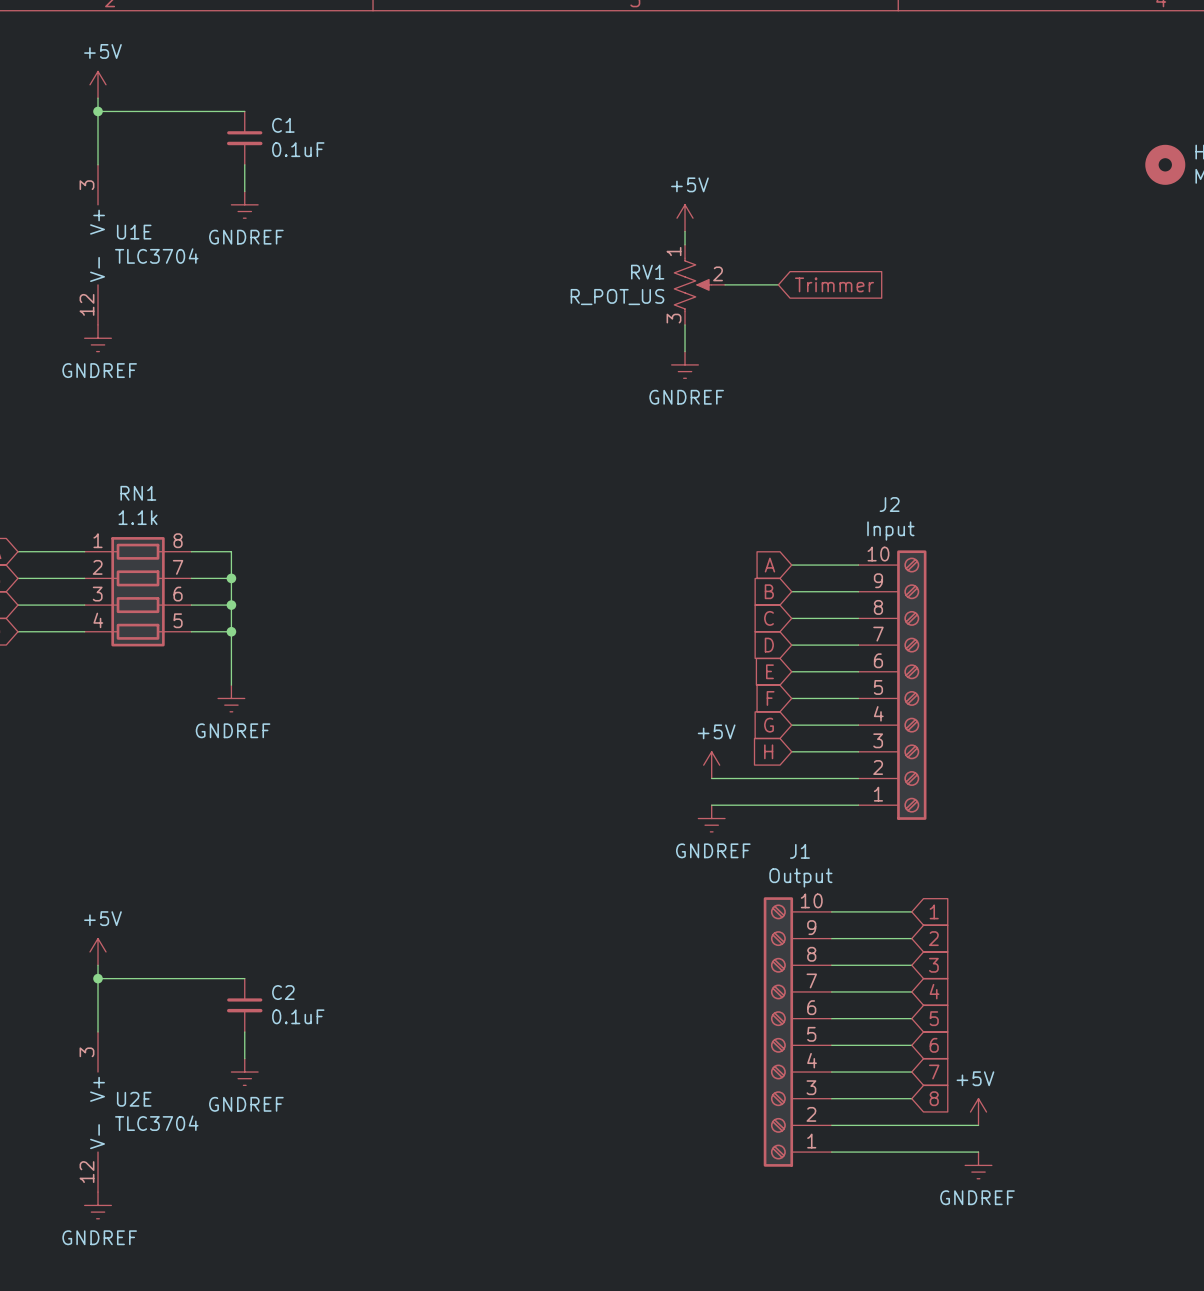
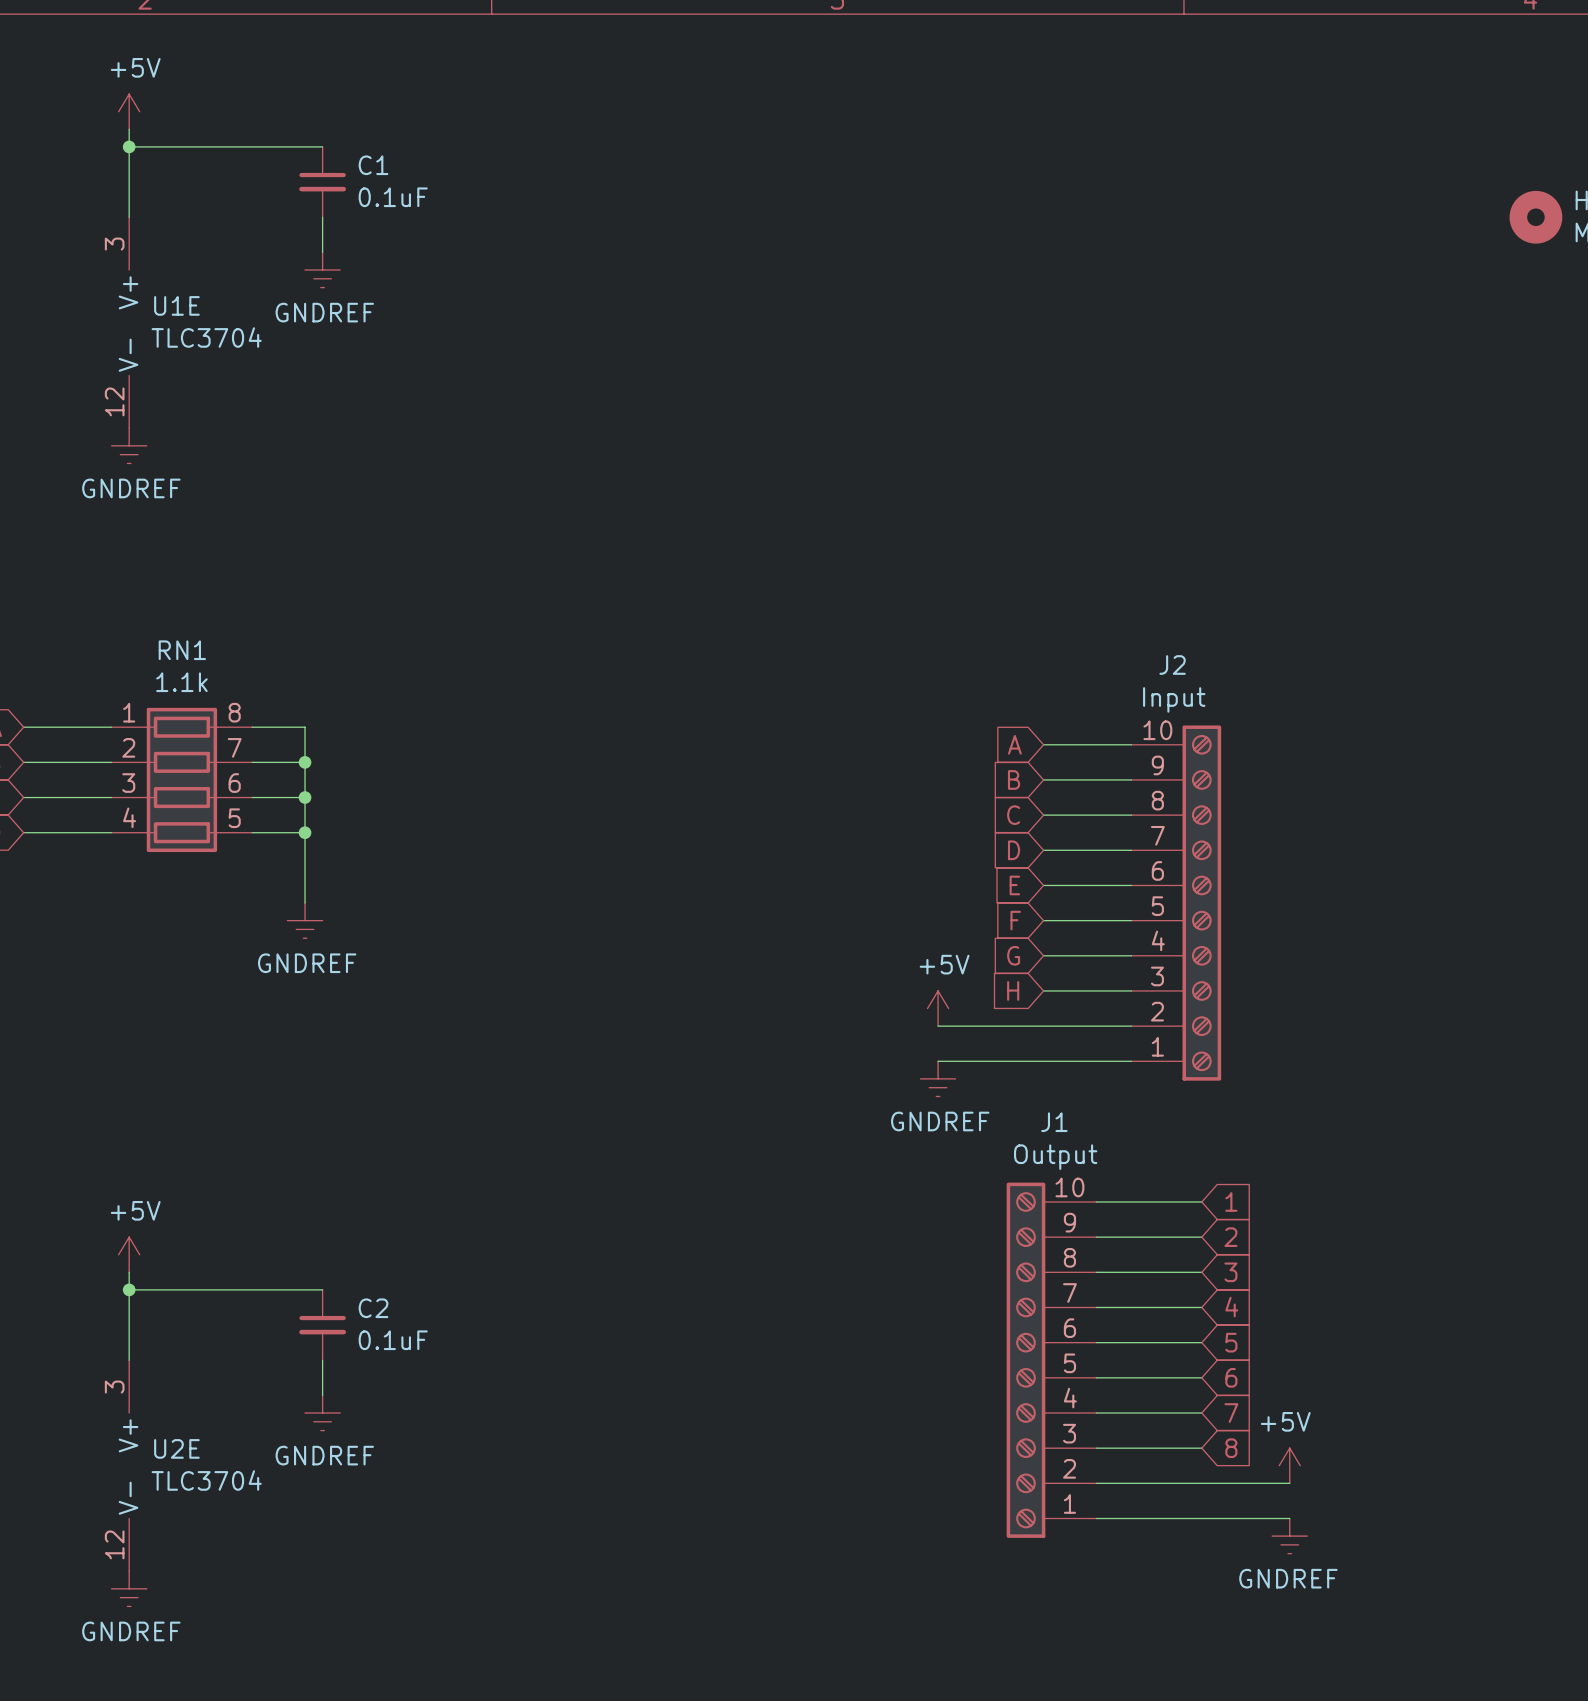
power symbol: +5V (685, 218) -> none
wire: (685, 231) (685, 244) -> none
RV1: R_POT_US (699, 284) -> none
wire: (725, 284) (778, 284) -> none
global label: Trimmer (834, 284) -> none
wire: (685, 324) (685, 351) -> none
power symbol: GNDREF (685, 364) -> none

